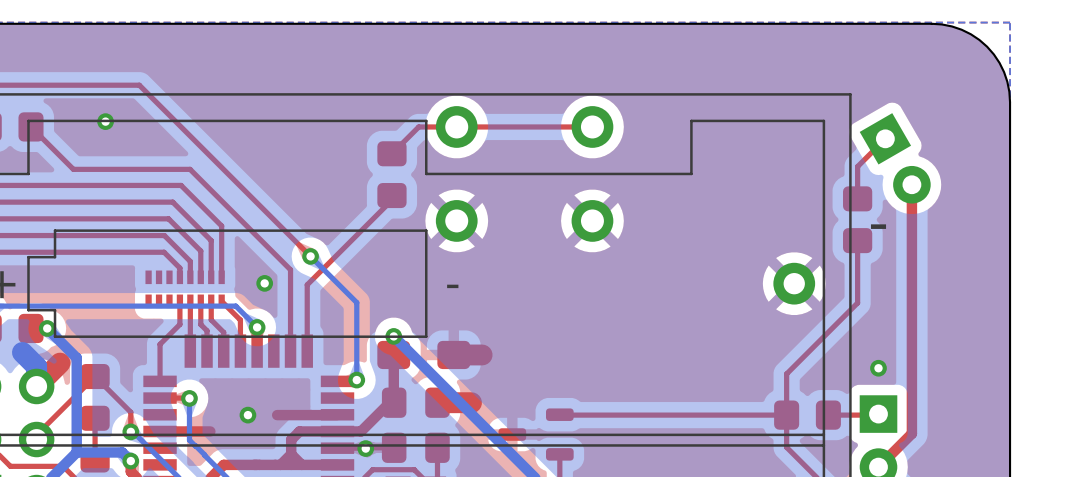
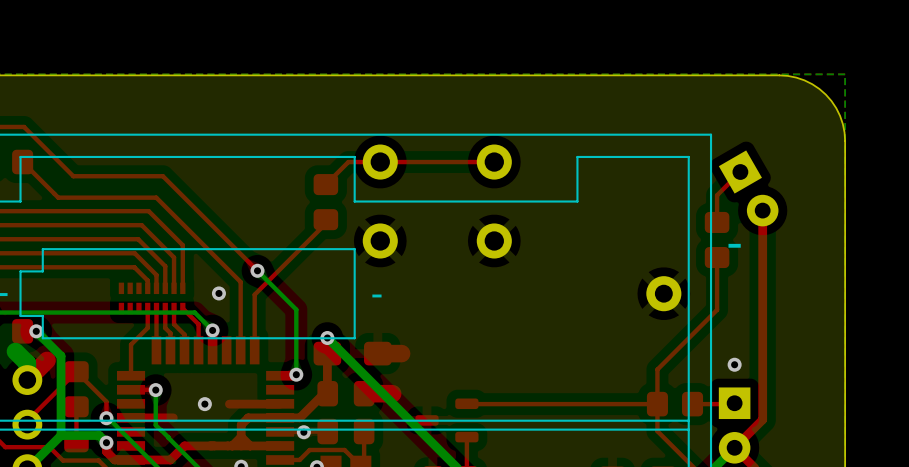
top track: (32, 85) (139, 85) (197, 143) -> (24, 126) (73, 176) (162, 176)
via: (105, 121) -> none

